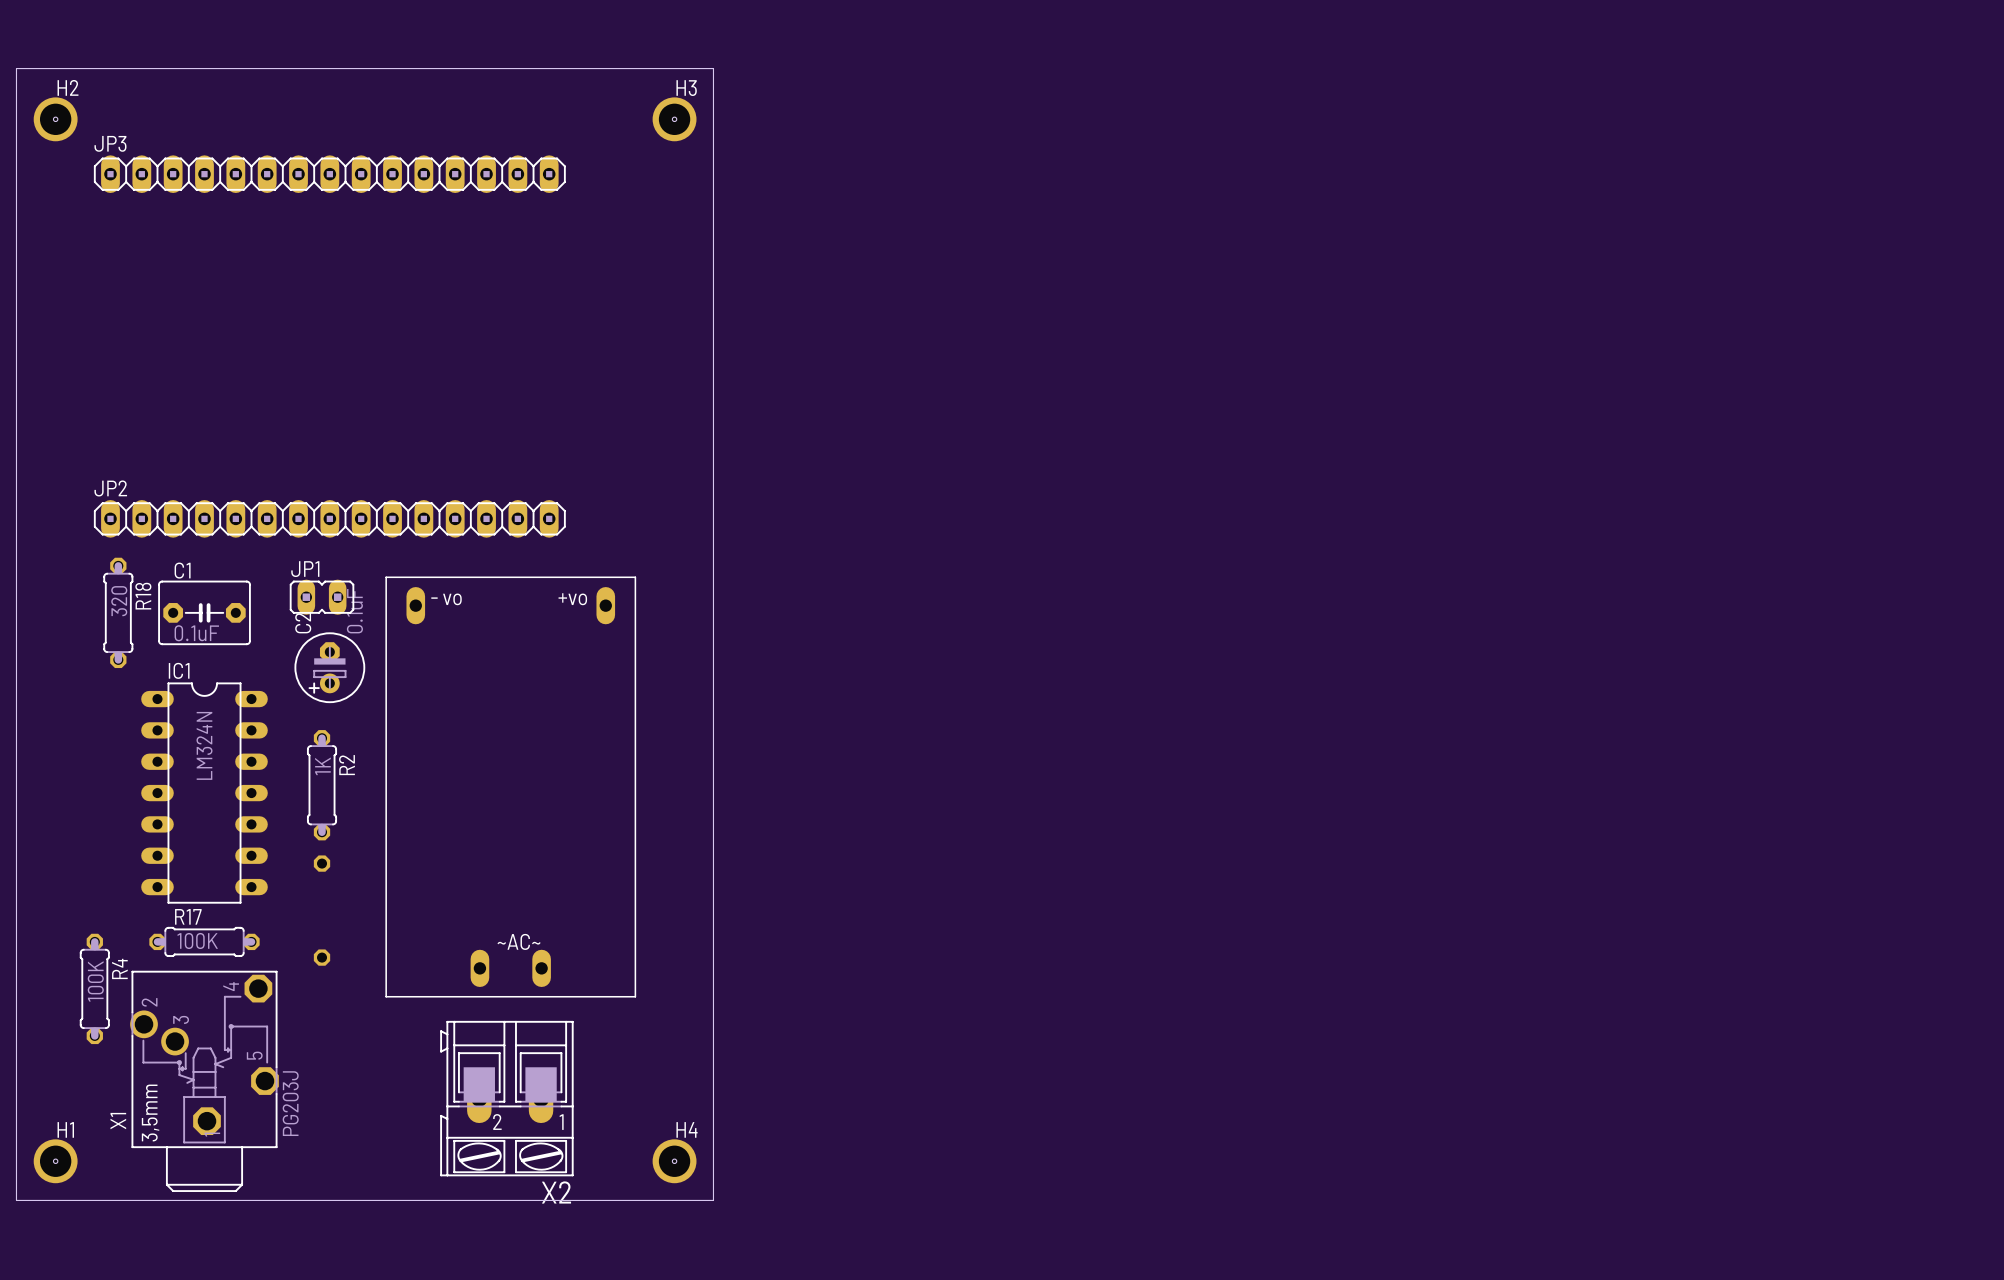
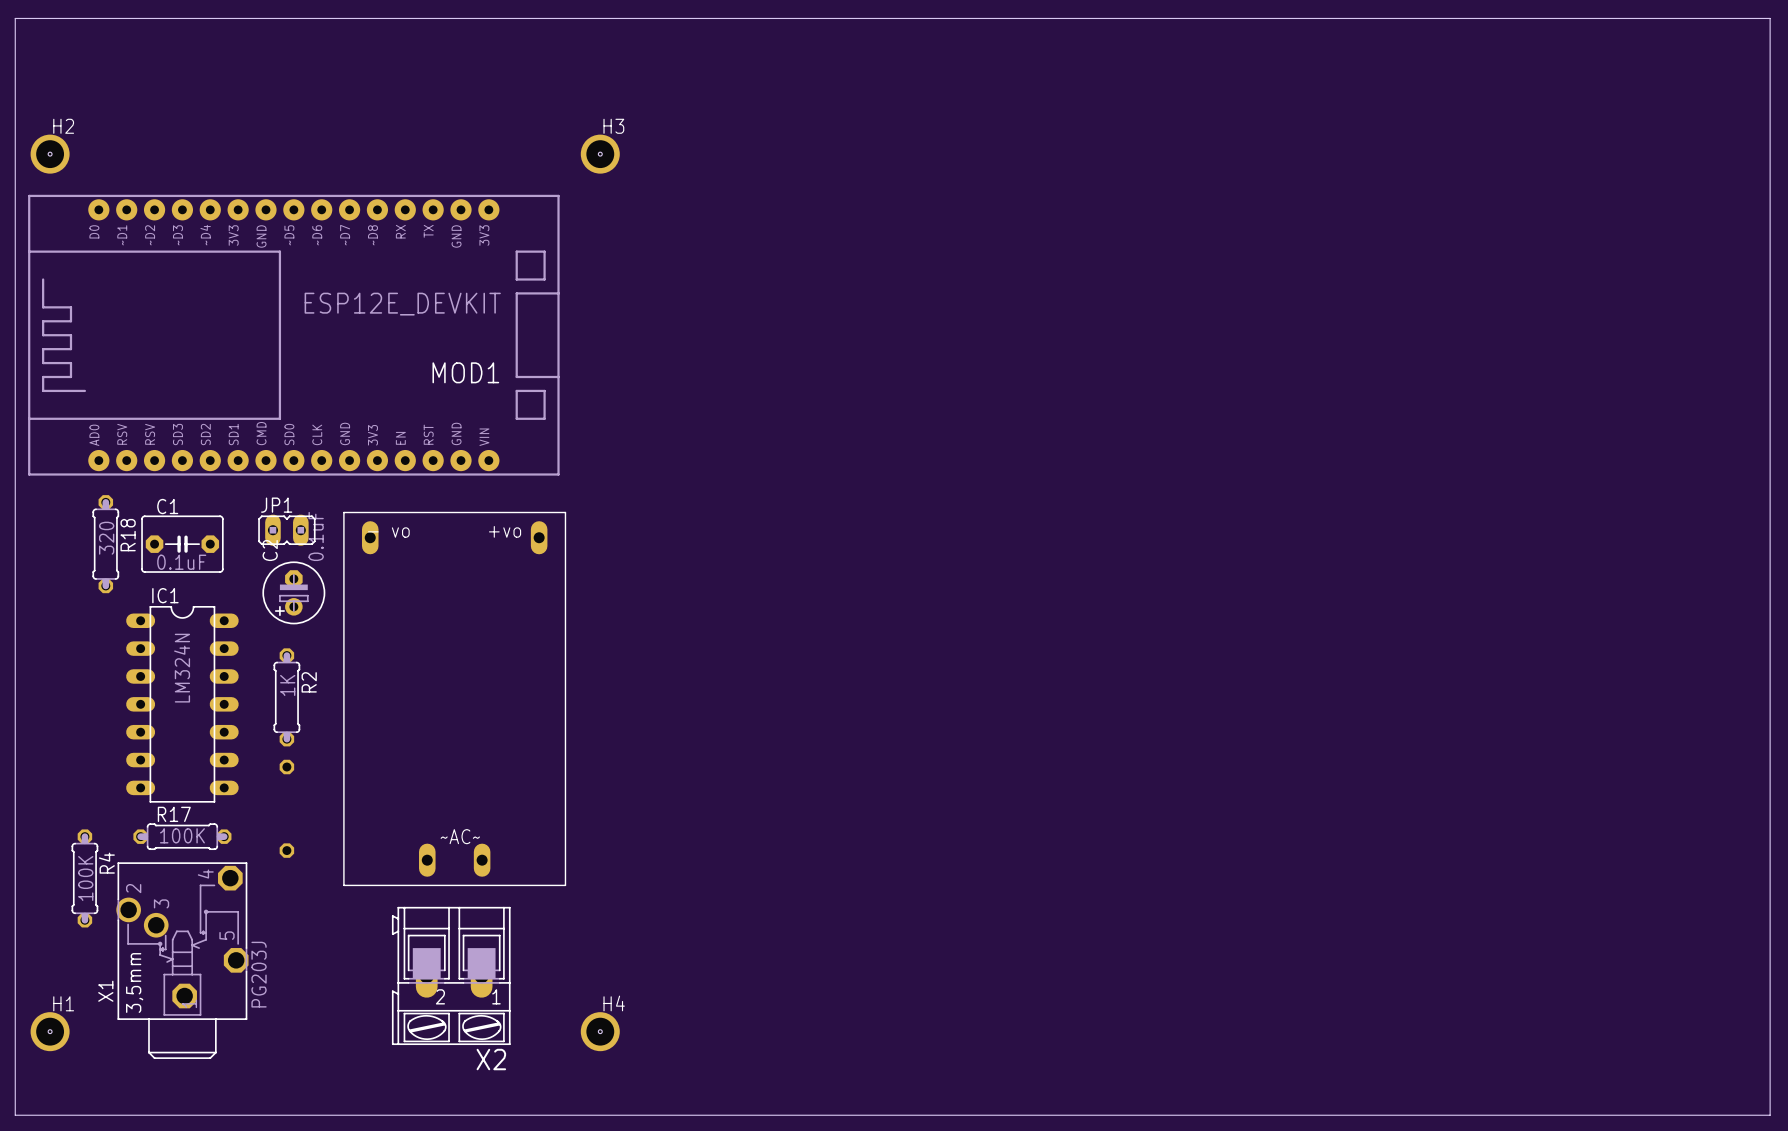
board edge: (16, 68) (713, 68) (713, 1200) (16, 1200) -> (15, 60) (15, 18) (1770, 18) (1770, 1115) (15, 1115) (15, 1066)
hole position: (55, 119) -> (50, 154)
H2 position: (55, 119) -> (50, 154)
hole position: (674, 119) -> (600, 154)
H3 position: (674, 119) -> (600, 154)
JP3: (329, 174) -> none
MOD1: none -> ESP12E_DEVKIT (293, 335)
JP2: (329, 518) -> none

